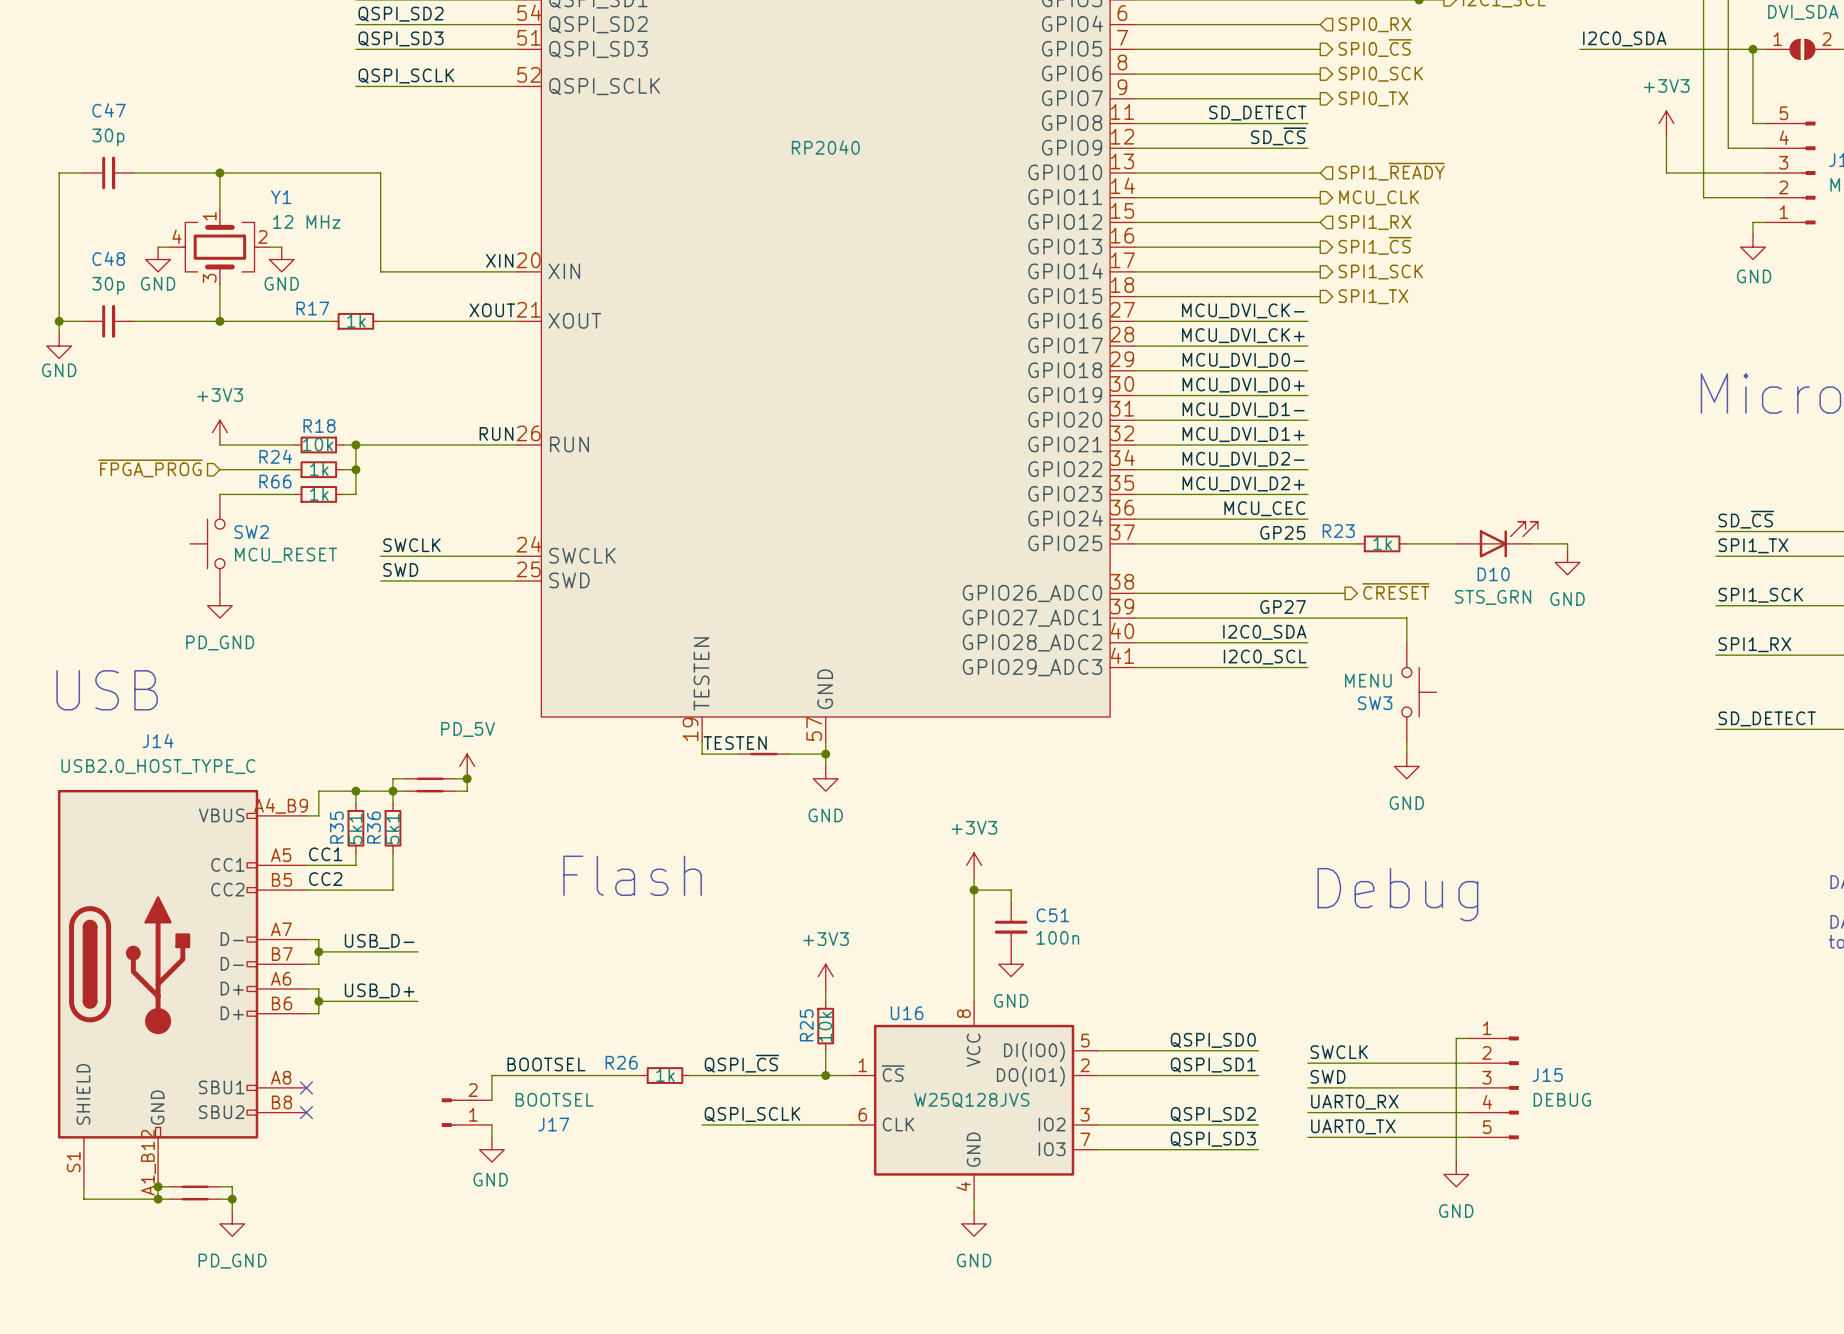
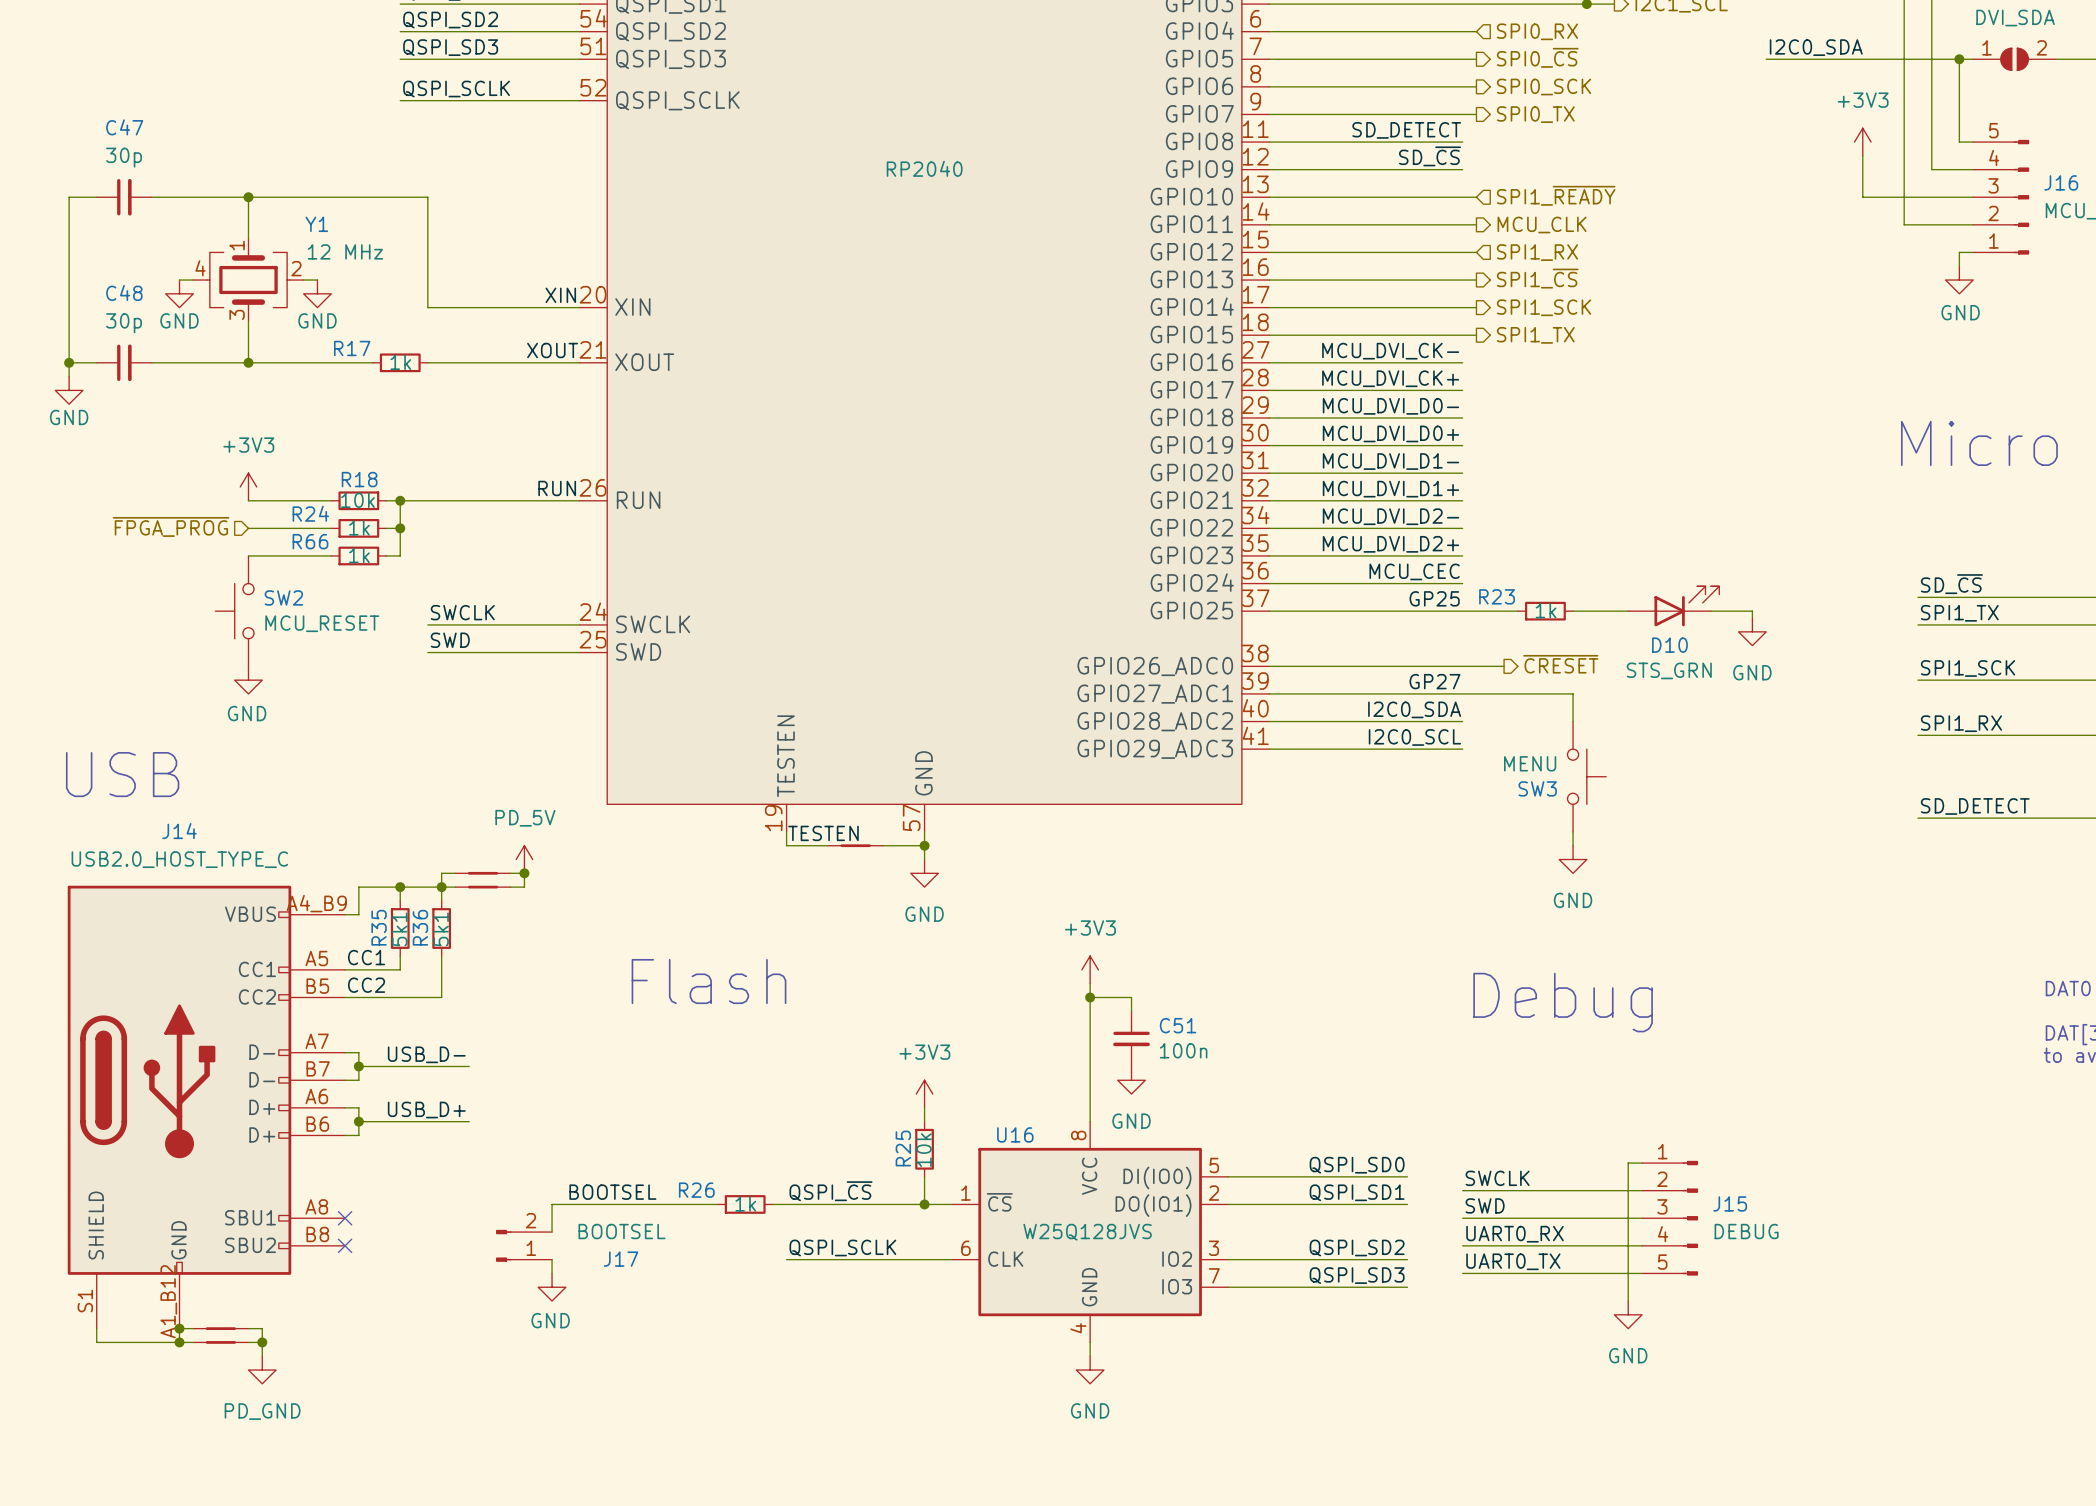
power symbol: PD_GND (219, 605) -> GND (248, 680)

